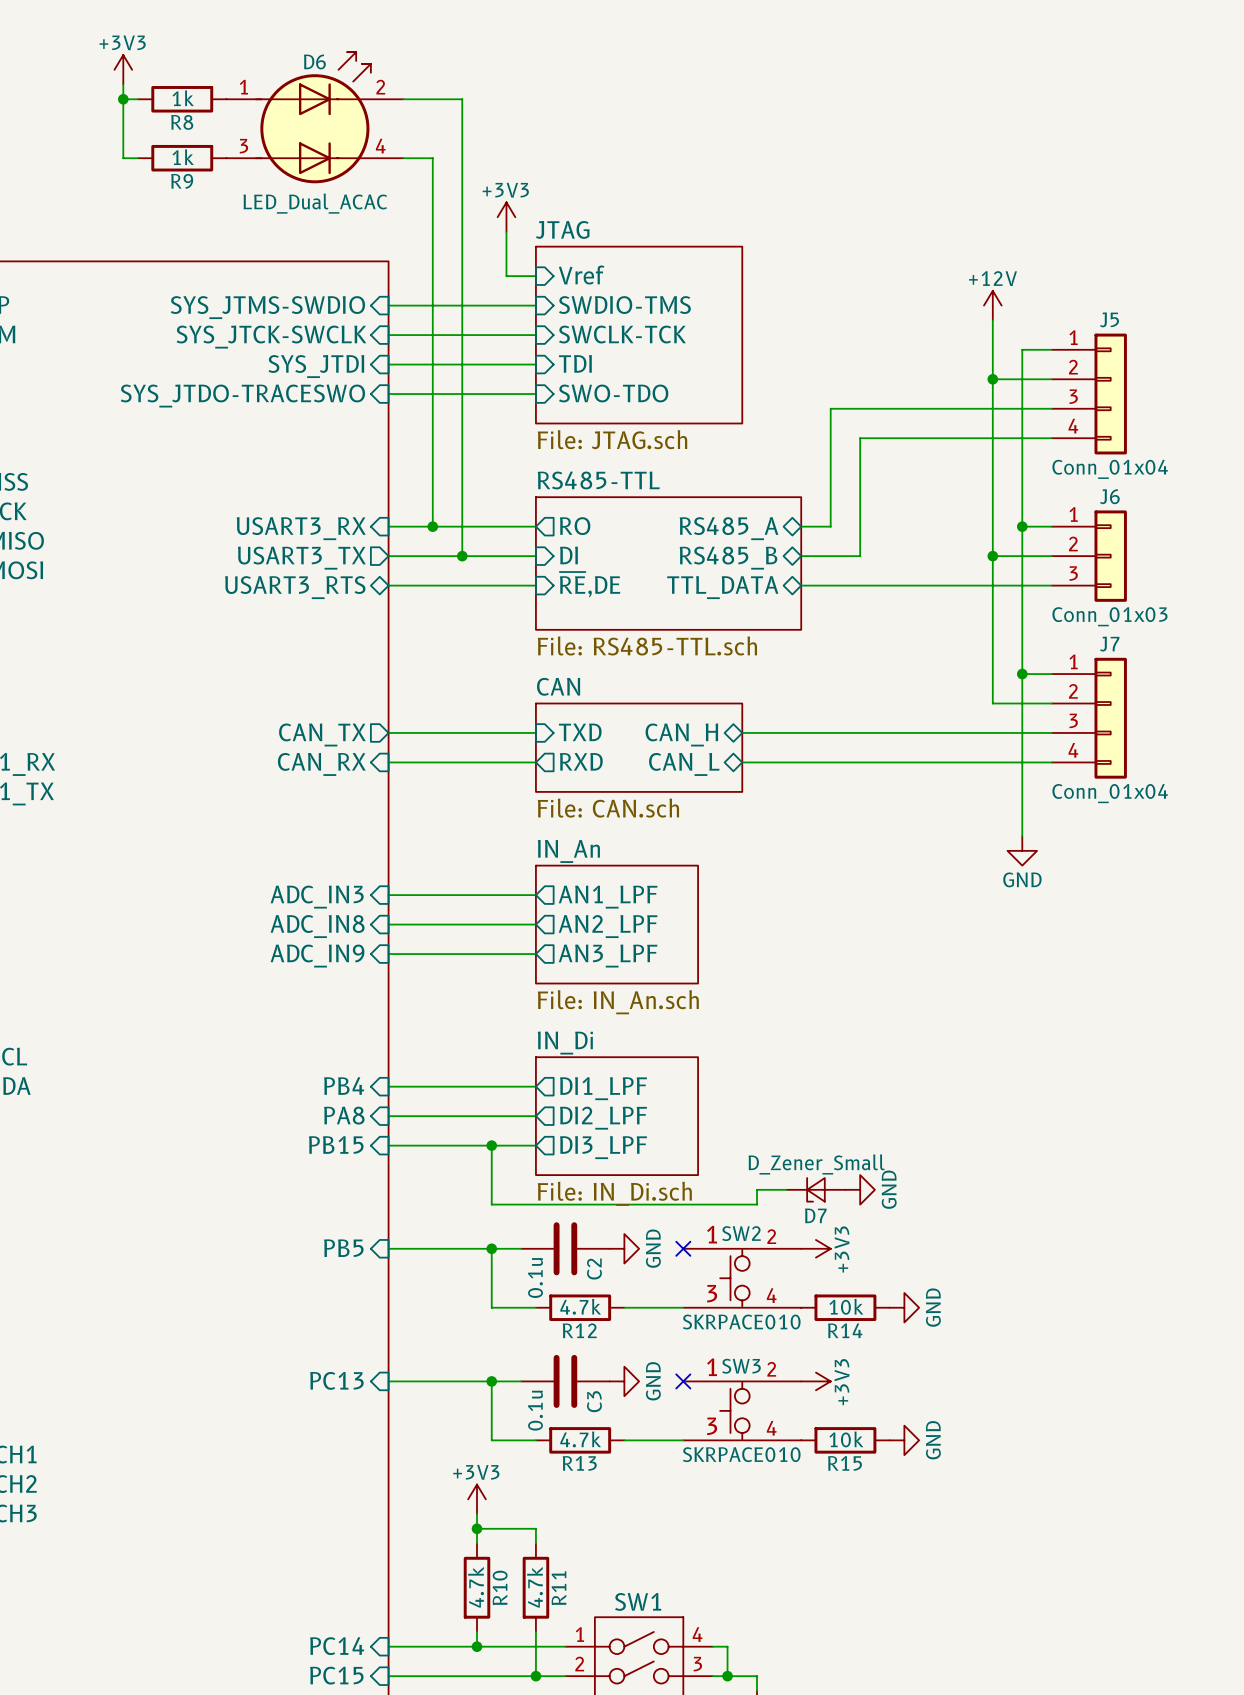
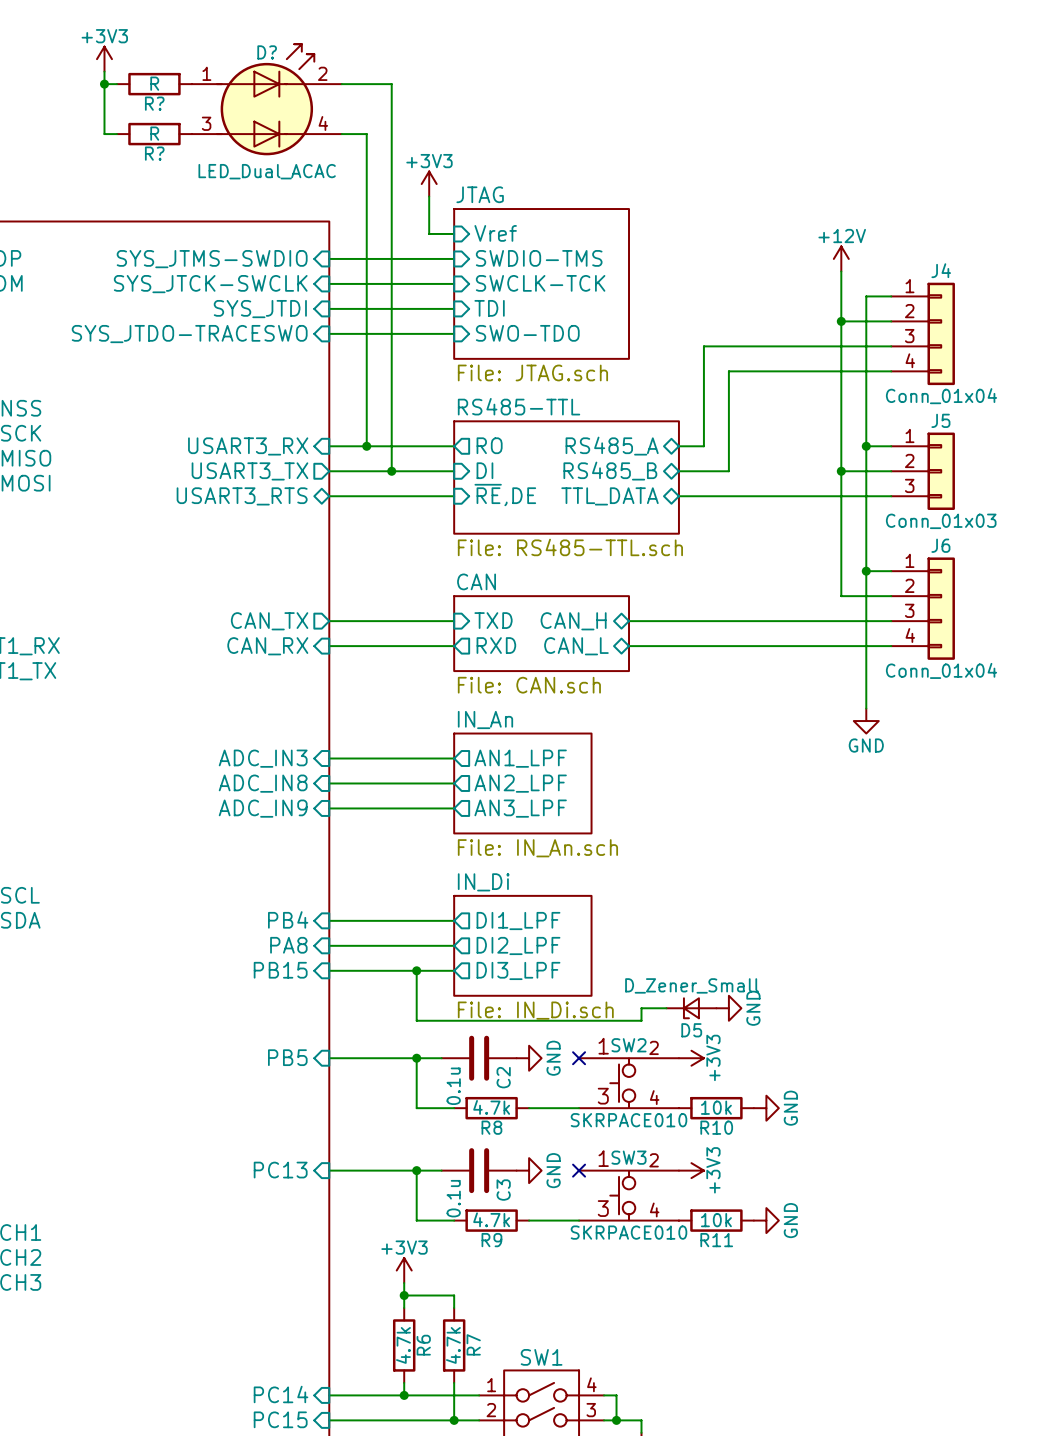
D6 name: D6 (314, 61) -> D? (267, 52)
R8 value: 1k (183, 98) -> R (154, 83)
R8 name: R8 (182, 122) -> R? (154, 103)
R9 value: 1k (183, 157) -> R (154, 133)
R9 name: R9 (182, 181) -> R? (154, 153)
J5 name: J5 (1109, 319) -> J4 (941, 270)
J6 name: J6 (1109, 496) -> J5 (940, 420)
J7 name: J7 (1109, 644) -> J6 (940, 545)
D7 name: D7 (815, 1215) -> D5 (691, 1030)
R12 name: R12 (579, 1330) -> R8 (491, 1127)
R14 name: R14 (845, 1330) -> R10 (716, 1127)
R13 name: R13 (579, 1463) -> R9 (491, 1240)
R15 name: R15 (844, 1463) -> R11 (716, 1240)
R10 name: R10 (500, 1587) -> R6 (423, 1345)
R11 name: R11 (558, 1588) -> R7 (473, 1344)

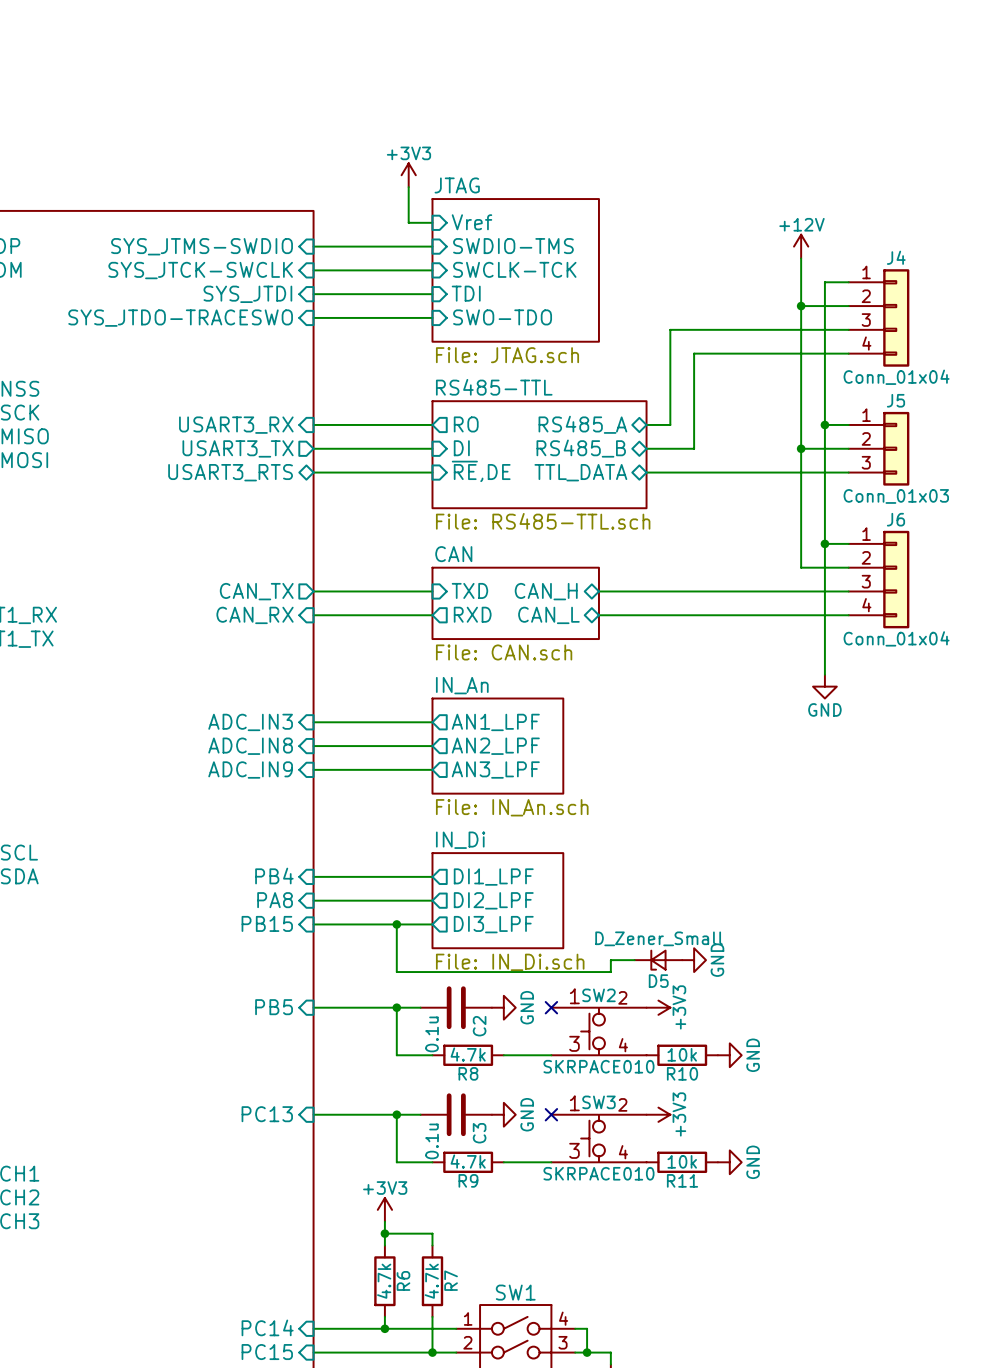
power symbol: +3V3 (104, 59) -> none
wire: (104, 71) (104, 134) (116, 134) -> none
wire: (104, 84) (116, 84) -> none
junction: (104, 84) -> none
R?: R (154, 84) -> none
wire: (341, 84) (391, 84) (391, 471) -> none
D?: LED_Dual_ACAC (266, 99) -> none
R?: R (154, 134) -> none
wire: (341, 134) (366, 134) (366, 446) -> none
junction: (366, 446) -> none
junction: (391, 471) -> none

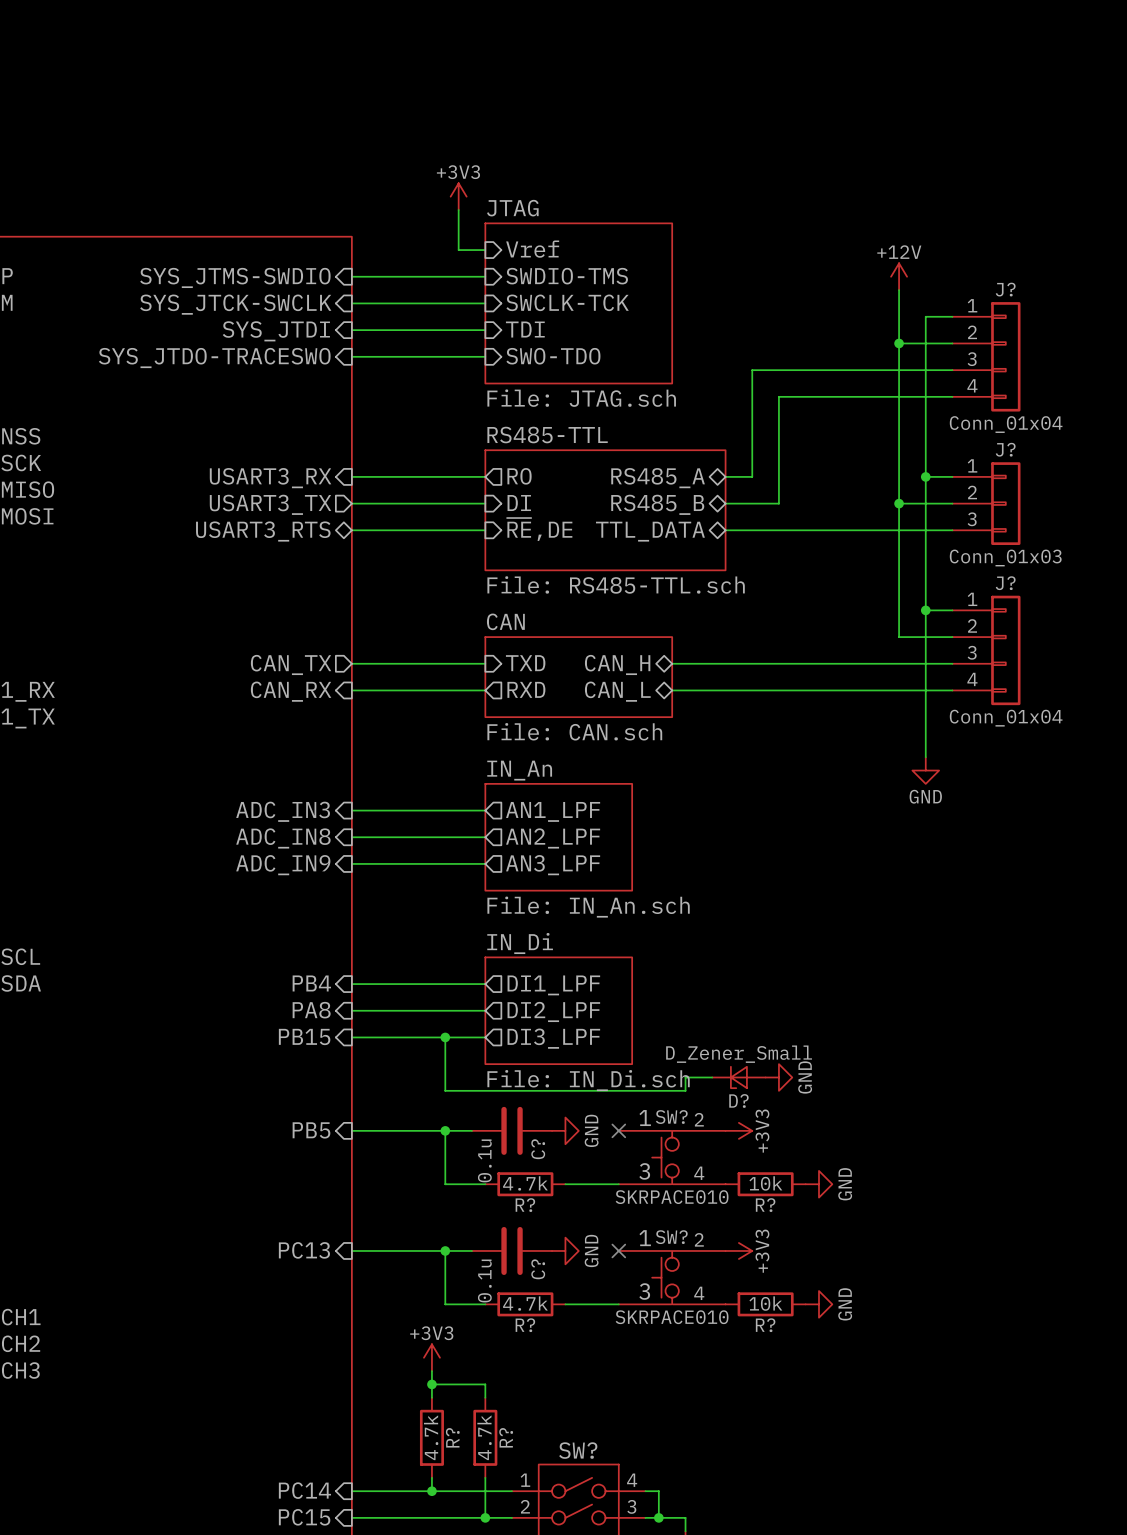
J4 name: J4 (896, 257) -> J? (1005, 289)
J5 name: J5 (895, 400) -> J? (1005, 449)
J6 name: J6 (895, 519) -> J? (1005, 583)
D5 name: D5 (658, 981) -> D? (738, 1100)
SW2 name: SW2 (598, 995) -> SW? (671, 1117)
C2 name: C2 (479, 1026) -> C? (538, 1149)
R8 name: R8 (468, 1073) -> R? (525, 1205)
R10 name: R10 (682, 1073) -> R? (765, 1205)
SW3 name: SW3 (598, 1102) -> SW? (671, 1237)
C3 name: C3 (479, 1133) -> C? (538, 1269)
R9 name: R9 (468, 1180) -> R? (525, 1325)
R11 name: R11 (682, 1180) -> R? (765, 1325)
R6 name: R6 (403, 1280) -> R? (452, 1437)
R7 name: R7 (451, 1280) -> R? (506, 1437)
SW1 name: SW1 (515, 1292) -> SW? (578, 1450)

